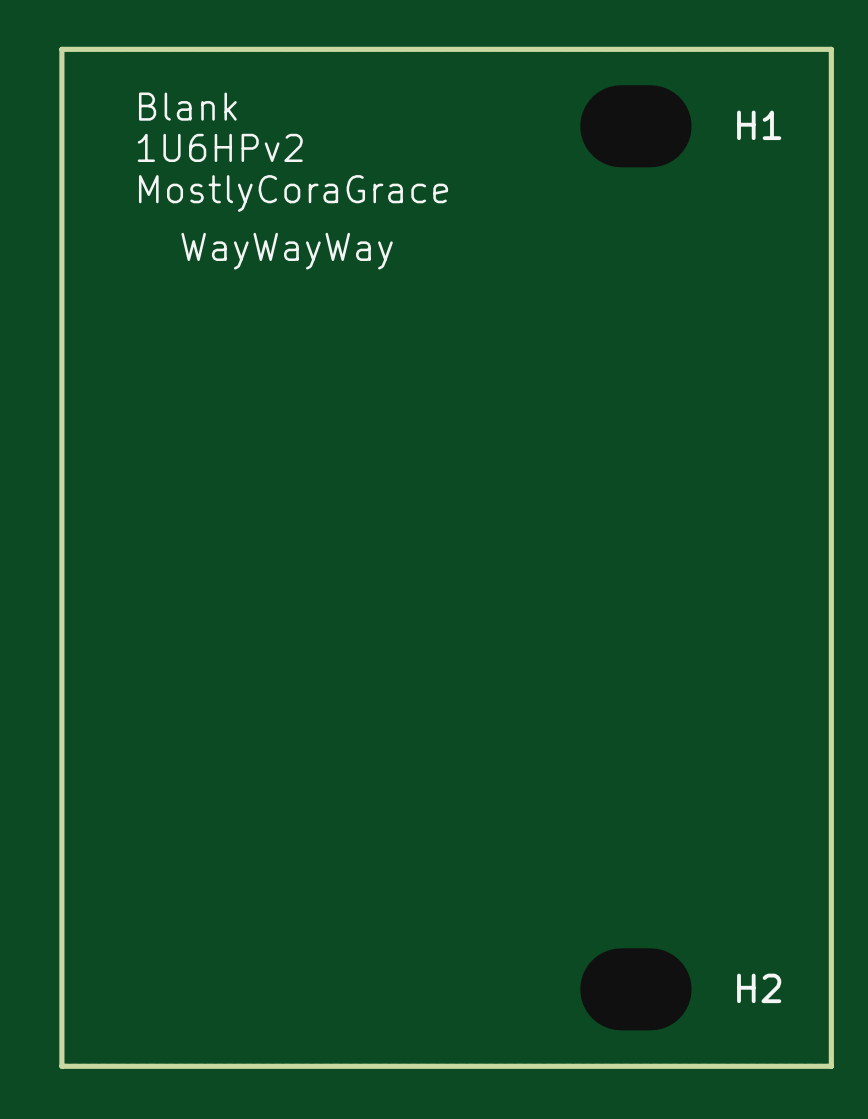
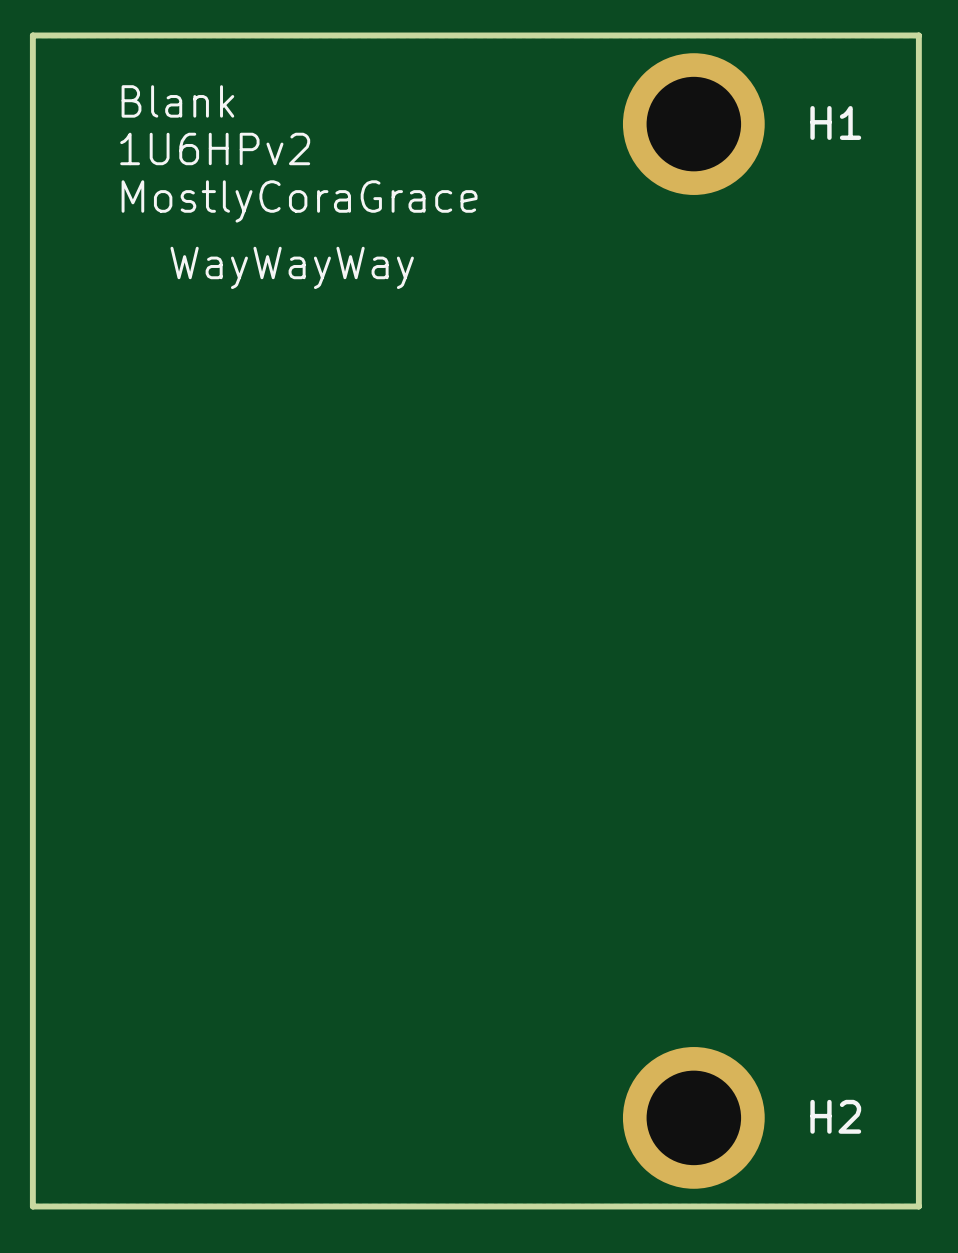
H1 footprint: [580, 85, 692, 168] -> [622, 53, 765, 195]
H2 footprint: [580, 948, 692, 1031] -> [622, 1047, 765, 1189]

